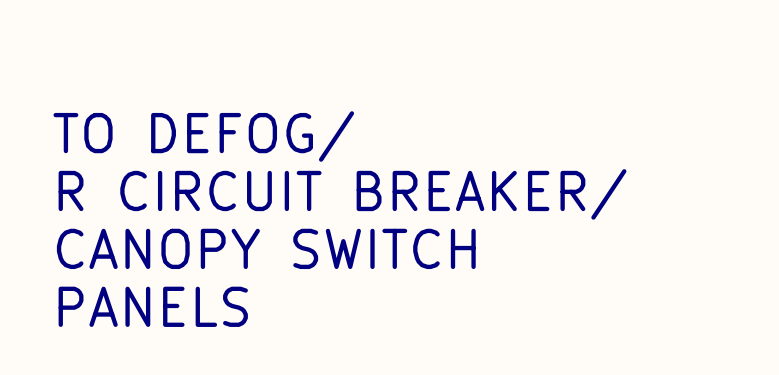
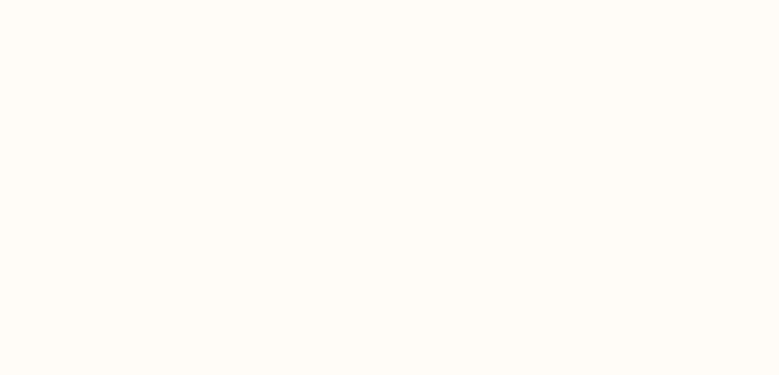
text: TO DEFOG/ (203, 136) -> none
text: R CIRCUIT BREAKER/ (342, 194) -> none
text: CANOPY SWITCH (266, 248) -> none
text: PANELS (153, 306) -> none

